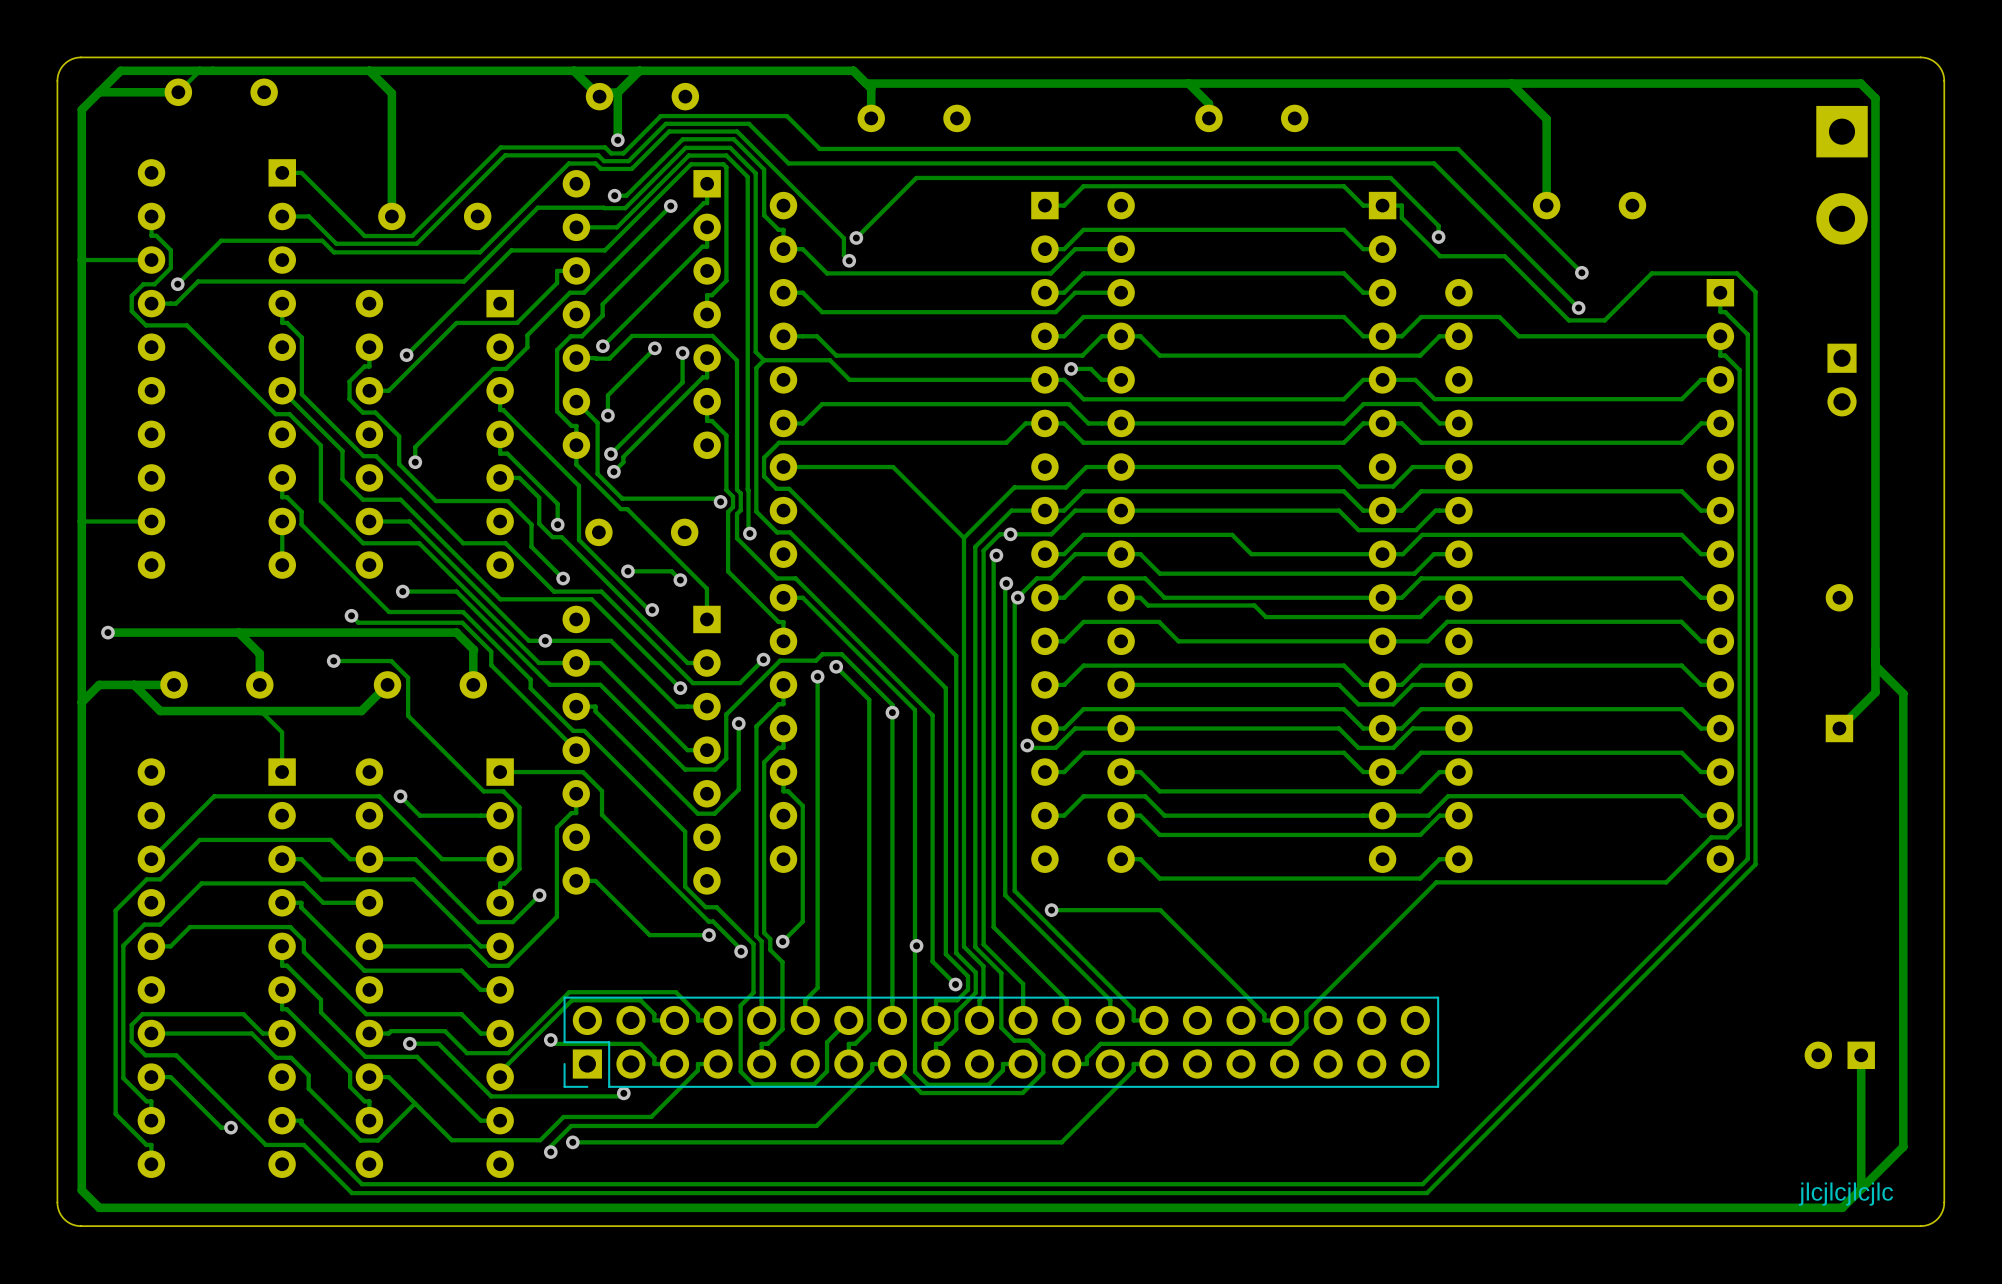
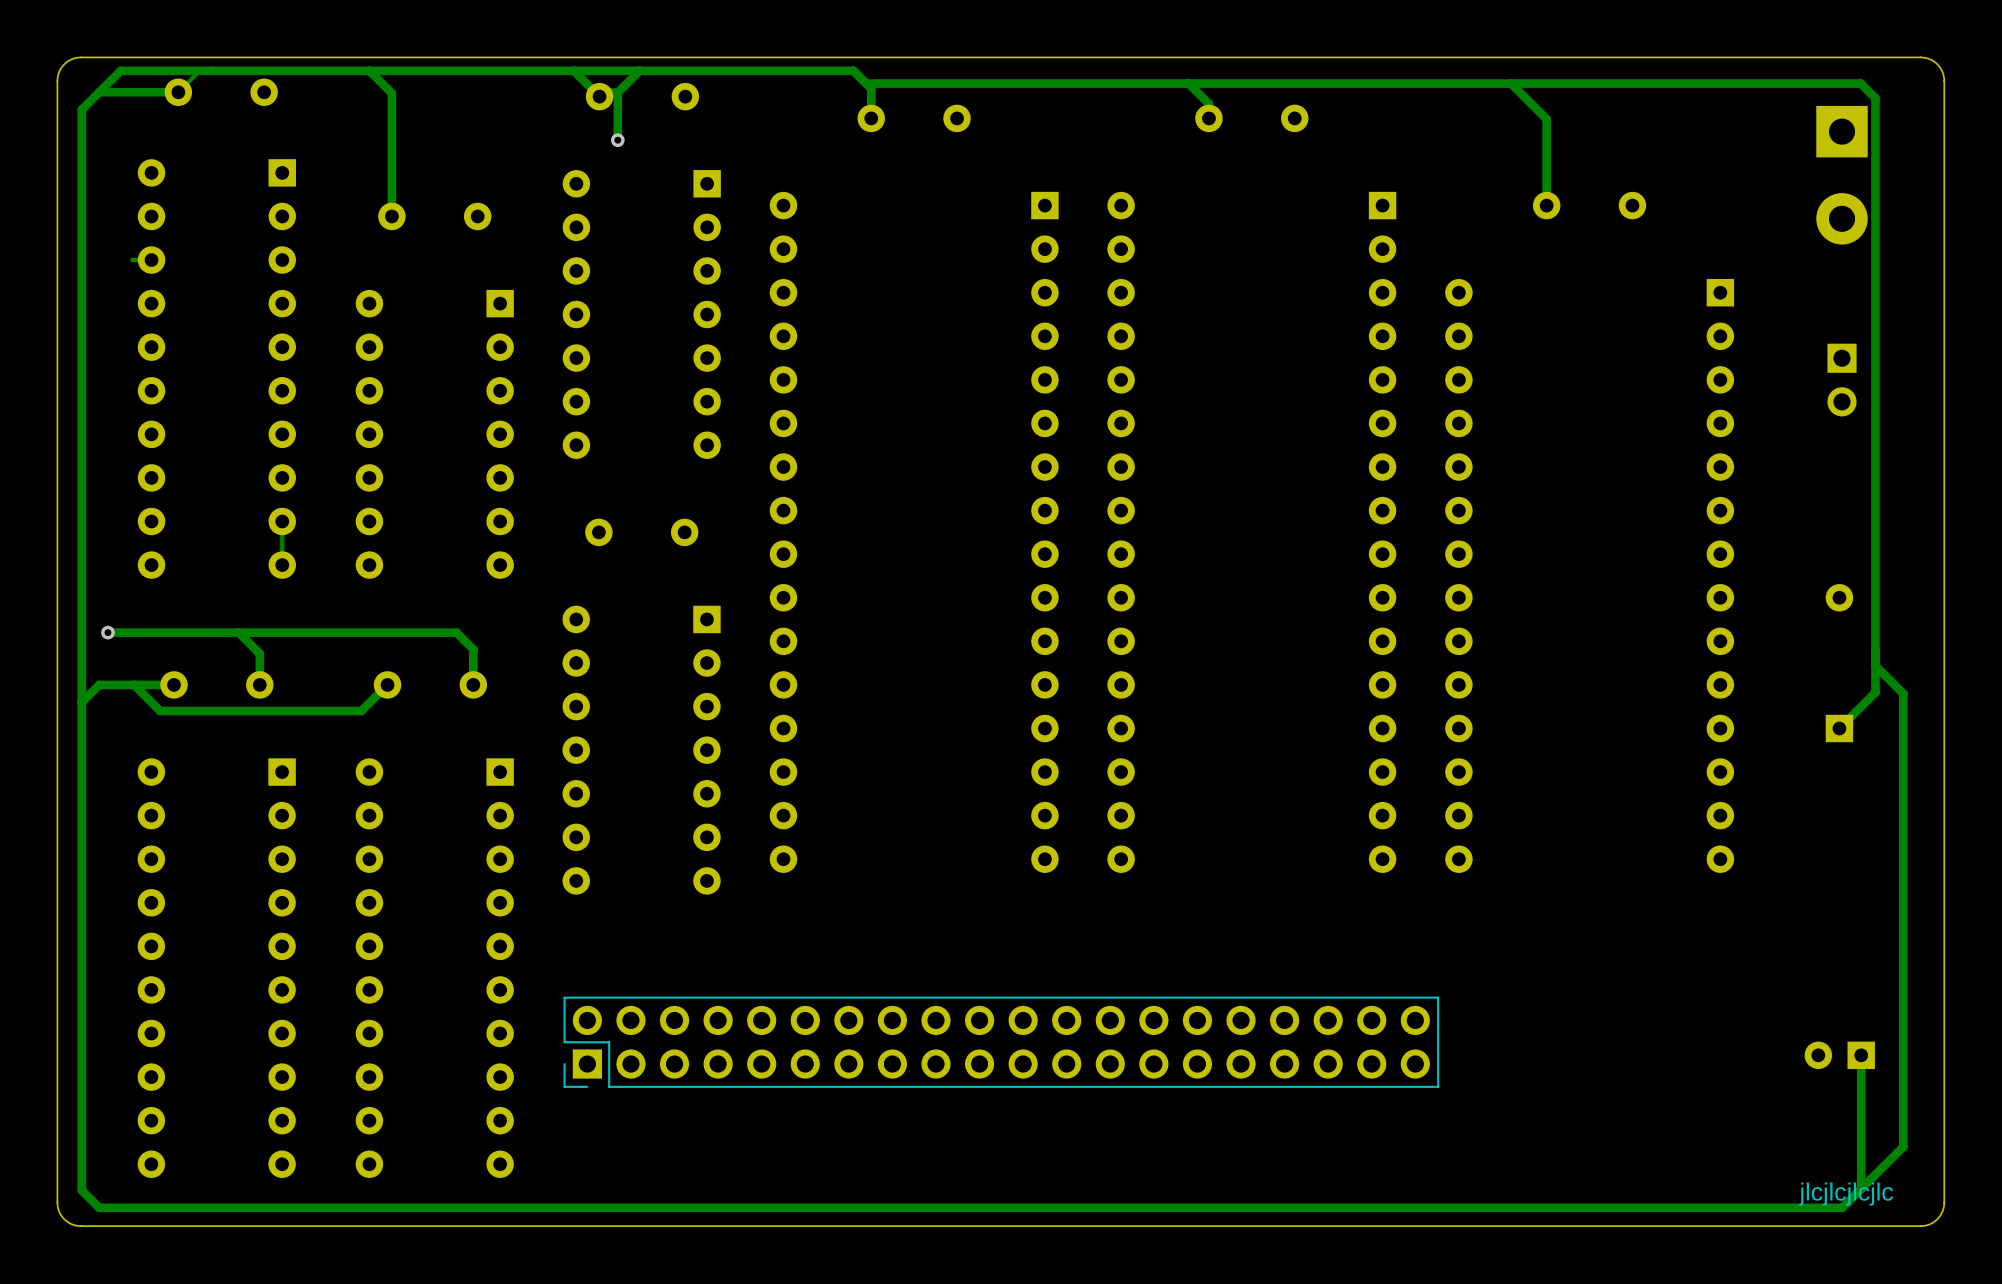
track: (282, 172) (301, 172) (364, 236) (412, 236) (500, 147) (605, 147) (611, 153) (623, 153) (660, 116) (786, 116) (819, 148) (1458, 148) (1581, 272) -> none
track: (707, 183) (707, 203) (703, 203) (602, 304) (602, 315) (581, 336) (570, 336) (557, 349) (557, 411) (571, 425) (576, 425) (576, 464) (620, 509) (627, 509) (706, 588) (706, 619) -> none
track: (614, 195) (626, 195) (682, 139) (733, 139) (764, 169) (764, 215) (778, 229) (783, 229) (783, 249) (802, 249) (827, 273) (1050, 273) (1075, 249) (1121, 249) -> none
via: (614, 195) -> none
track: (1044, 205) (1064, 205) (1083, 186) (1343, 186) (1363, 205) (1401, 205) (1401, 217) (1440, 256) (1504, 256) (1568, 320) (1604, 320) (1651, 273) (1736, 273) (1755, 291) (1755, 864) (1426, 1193) (352, 1193) (303, 1144) (265, 1144) (176, 1055) (145, 1055) (131, 1041) (131, 1024) (142, 1014) (243, 1014) (262, 1033) (282, 1033) -> none
track: (670, 206) (584, 292) (570, 292) (527, 335) (527, 347) (505, 368) (493, 368) (415, 447) (415, 462) -> none
via: (670, 206) -> none
track: (151, 216) (151, 235) (156, 235) (170, 250) (170, 268) (154, 284) (143, 284) (131, 295) (131, 311) (146, 325) (186, 325) (275, 414) (289, 414) (320, 445) (320, 500) (363, 543) (419, 543) (539, 663) (600, 663) (687, 750) (706, 750) -> none
track: (282, 216) (309, 216) (336, 243) (416, 243) (505, 155) (598, 155) (604, 161) (628, 161) (665, 123) (748, 123) (788, 163) (1434, 163) (1578, 307) -> none
track: (576, 227) (617, 227) (688, 155) (726, 155) (747, 176) (747, 489) (749, 533) -> none
track: (707, 227) (707, 246) (702, 246) (602, 346) -> none
via: (856, 237) -> none
track: (1438, 237) (1438, 225) (1390, 177) (916, 177) (856, 237) -> none
via: (1438, 237) -> none
track: (1382, 249) (1363, 249) (1343, 229) (1083, 229) (1064, 249) (1044, 249) -> none
track: (132, 260) (81, 260) -> none
track: (849, 260) (843, 255) (843, 238) (737, 131) (669, 131) (631, 168) (600, 168) (595, 163) (568, 163) (480, 252) (333, 252) (322, 240) (221, 240) (177, 284) -> none
via: (849, 260) -> none
track: (576, 270) (557, 270) (557, 283) (517, 322) (456, 322) (388, 390) (369, 390) -> none
via: (1581, 272) -> none
via: (177, 284) -> none
track: (1121, 292) (1075, 292) (1055, 312) (822, 312) (802, 292) (783, 292) -> none
track: (1382, 292) (1363, 292) (1343, 273) (1083, 273) (1064, 292) (1044, 292) -> none
track: (1720, 292) (1720, 312) (1725, 312) (1747, 334) (1747, 859) (1422, 1184) (362, 1184) (301, 1123) (301, 1120) (282, 1120) -> none
track: (151, 303) (175, 303) (198, 281) (464, 281) (537, 207) (625, 208) (685, 147) (730, 147) (755, 173) (755, 351) (764, 360) -> none
track: (282, 303) (282, 322) (287, 322) (301, 337) (301, 394) (363, 456) (376, 456) (463, 543) (505, 543) (553, 591) (601, 591) (693, 683) (739, 683) (763, 659) -> none
via: (1578, 307) -> none
track: (707, 314) (707, 295) (711, 295) (726, 280) (726, 167) (723, 164) (691, 164) (604, 250) (511, 250) (406, 355) -> none
track: (1044, 336) (1064, 336) (1083, 316) (1343, 316) (1363, 336) (1401, 336) (1421, 316) (1499, 316) (1518, 336) (1720, 336) (1720, 355) (1725, 355) (1739, 370) (1739, 825) (1727, 837) (1711, 837) (1666, 882) (1436, 882) (1306, 1012) (1306, 1027) (1290, 1043) (1100, 1043) (1086, 1057) (1086, 1064) (1066, 1064) -> none
track: (1458, 336) (1439, 336) (1420, 355) (1159, 355) (1140, 336) (1101, 336) (1082, 355) (836, 355) (817, 336) (783, 336) -> none
via: (602, 346) -> none
track: (369, 347) (369, 366) (364, 366) (349, 381) (349, 399) (362, 412) (375, 412) (399, 436) (399, 464) (436, 501) (508, 501) (531, 524) (531, 546) (563, 578) -> none
track: (654, 348) (607, 395) (607, 415) -> none
via: (654, 348) -> none
track: (682, 353) (682, 382) (610, 454) -> none
via: (682, 353) -> none
via: (406, 355) -> none
track: (576, 358) (609, 358) (632, 335) (712, 335) (737, 360) (737, 489) (740, 493) (740, 510) (737, 513) (737, 538) (777, 578) (795, 578) (932, 715) (932, 961) (955, 984) -> none
track: (707, 358) (707, 377) (702, 377) (623, 456) (623, 462) (613, 471) -> none
track: (764, 360) (830, 360) (849, 379) (1064, 379) (1083, 399) (1343, 399) (1363, 379) (1415, 379) (1434, 399) (1681, 399) (1701, 379) (1720, 379) -> none
track: (764, 360) (756, 367) (756, 511) (777, 532) (790, 532) (945, 688) (945, 954) (968, 976) (968, 989) (957, 1000) (936, 1000) (936, 1020) -> none
track: (1071, 368) (1090, 368) (1101, 379) (1121, 379) -> none
via: (1071, 368) -> none
track: (282, 390) (342, 450) (342, 479) (362, 499) (400, 499) (500, 599) (591, 599) (680, 688) -> none
track: (500, 390) (500, 410) (503, 410) (579, 485) (579, 540) (648, 609) (652, 609) -> none
track: (576, 401) (597, 422) (597, 473) (622, 498) (717, 498) (720, 501) -> none
track: (707, 401) (707, 420) (711, 420) (726, 435) (726, 490) (733, 496) (733, 507) (728, 511) (728, 571) (778, 622) (783, 622) (783, 641) -> none
via: (607, 415) -> none
track: (1458, 423) (1439, 423) (1420, 404) (1363, 404) (1344, 423) (1088, 423) (1069, 404) (822, 404) (802, 423) (783, 423) -> none
track: (1720, 423) (1701, 423) (1681, 442) (1421, 442) (1401, 423) (1363, 423) (1343, 442) (1083, 442) (1064, 423) (1025, 423) (1006, 442) (779, 442) (764, 457) (764, 476) (776, 488) (789, 488) (956, 655) (956, 953) (975, 972) (975, 992) (956, 1012) (956, 1029) (941, 1043) (936, 1043) (936, 1064) -> none
track: (500, 434) (500, 453) (507, 453) (557, 503) (557, 524) -> none
via: (610, 454) -> none
via: (415, 462) -> none
track: (783, 467) (893, 467) (963, 537) -> none
track: (1458, 467) (1412, 467) (1393, 486) (1358, 486) (1339, 467) (1086, 467) (1065, 487) (1014, 487) (963, 537) -> none
via: (613, 471) -> none
track: (282, 477) (282, 497) (287, 497) (301, 511) (301, 524) (389, 612) (463, 612) (530, 679) (530, 688) (573, 730) (584, 730) (685, 831) (685, 886) (705, 907) (716, 907) (753, 944) (753, 992) (740, 1005) (740, 1071) (753, 1084) (814, 1084) (827, 1071) (827, 1042) (848, 1020) -> none
track: (500, 477) (519, 477) (539, 497) (539, 523) (552, 537) (561, 537) (687, 663) (706, 663) -> none
via: (720, 501) -> none
track: (1458, 510) (1435, 510) (1416, 530) (1358, 530) (1339, 510) (1075, 510) (1051, 534) (999, 534) (983, 550) (983, 944) (1023, 984) (1023, 1020) -> none
track: (1720, 510) (1701, 510) (1681, 491) (1421, 491) (1401, 510) (1363, 510) (1343, 491) (1083, 491) (1064, 510) (1011, 510) (975, 546) (975, 947) (1001, 973) (1001, 1027) (1014, 1040) (1028, 1040) (1043, 1055) (1043, 1072) (1022, 1093) (921, 1093) (892, 1064) (872, 1064) (872, 1070) (816, 1125) (571, 1125) (550, 1146) (550, 1152) -> none
track: (151, 521) (81, 521) -> none
track: (369, 521) (409, 521) (528, 640) (610, 640) (676, 706) (706, 706) -> none
via: (557, 524) -> none
via: (749, 533) -> none
via: (1010, 534) -> none
track: (963, 537) (963, 946) (983, 966) (983, 996) (979, 1000) (979, 1020) -> none
track: (1458, 554) (1433, 554) (1414, 573) (1159, 573) (1140, 554) (1075, 554) (1050, 578) (1036, 578) (1014, 600) (1014, 890) (1133, 1009) (1133, 1020) (1153, 1020) -> none
track: (1720, 554) (1701, 554) (1681, 534) (1422, 534) (1402, 554) (1251, 554) (1232, 534) (1083, 534) (1064, 554) (1044, 554) -> none
track: (996, 555) (993, 558) (993, 927) (1066, 1000) (1066, 1020) -> none
via: (996, 555) -> none
track: (627, 571) (671, 571) (680, 580) -> none
via: (627, 571) -> none
via: (563, 578) -> none
via: (680, 580) -> none
track: (1006, 583) (1005, 895) (1110, 1000) (1110, 1020) -> none
via: (1006, 583) -> none
track: (402, 591) (456, 591) (549, 684) (600, 684) (685, 769) (715, 769) (726, 758) (726, 714) (780, 660) (816, 660) (822, 654) (841, 654) (892, 704) (892, 1020) -> none
via: (402, 591) -> none
track: (783, 597) (802, 597) (915, 709) (915, 1071) (927, 1084) (988, 1084) (1002, 1070) (1002, 1064) (1023, 1064) -> none
via: (1017, 597) -> none
track: (1458, 597) (1439, 597) (1420, 617) (1266, 617) (1254, 605) (1148, 605) (1140, 597) (1121, 597) -> none
track: (1720, 597) (1701, 597) (1681, 578) (1421, 578) (1401, 597) (1164, 597) (1145, 578) (1083, 578) (1064, 597) (1044, 597) -> none
via: (652, 609) -> none
track: (351, 615) (358, 622) (462, 622) (491, 651) (491, 665) (576, 750) -> none
via: (351, 615) -> none
via: (545, 640) -> none
track: (1720, 641) (1701, 641) (1681, 621) (1447, 621) (1427, 641) (1178, 641) (1159, 621) (1083, 621) (1064, 641) (1044, 641) -> none
via: (763, 659) -> none
track: (333, 661) (391, 661) (408, 677) (408, 715) (483, 791) (503, 791) (519, 807) (519, 869) (504, 883) (500, 883) (500, 902) -> none
via: (333, 661) -> none
track: (836, 666) (869, 699) (869, 1029) (855, 1043) (848, 1043) (848, 1064) -> none
via: (836, 666) -> none
track: (817, 676) (817, 987) (805, 1000) (805, 1020) -> none
via: (817, 676) -> none
track: (783, 684) (783, 704) (778, 704) (756, 726) (756, 936) (761, 941) (761, 1020) -> none
track: (1458, 684) (1412, 684) (1393, 704) (1358, 704) (1339, 684) (1121, 684) -> none
track: (1720, 684) (1701, 684) (1681, 665) (1421, 665) (1401, 684) (1363, 684) (1343, 665) (1083, 665) (1064, 684) (1044, 684) -> none
via: (680, 688) -> none
track: (576, 706) (595, 706) (595, 711) (697, 813) (714, 813) (738, 789) (738, 723) -> none
track: (260, 711) (282, 732) (282, 772) -> none
via: (892, 712) -> none
via: (738, 723) -> none
track: (783, 728) (783, 747) (778, 747) (764, 762) (764, 932) (770, 939) (770, 949) (782, 962) (782, 1029) (767, 1043) (761, 1043) (761, 1064) -> none
track: (1458, 728) (1412, 728) (1393, 747) (1358, 747) (1339, 728) (1075, 728) (1055, 747) (1029, 747) (1027, 745) -> none
track: (1720, 728) (1701, 728) (1681, 709) (1421, 709) (1401, 728) (1363, 728) (1343, 709) (1083, 709) (1064, 728) (1044, 728) -> none
via: (1027, 745) -> none
track: (500, 772) (582, 772) (602, 791) (602, 814) (708, 921) (713, 921) (741, 951) -> none
track: (783, 772) (783, 791) (788, 791) (802, 805) (802, 921) (782, 941) -> none
track: (1458, 772) (1439, 772) (1420, 791) (1159, 791) (1140, 772) (1121, 772) -> none
track: (1720, 772) (1701, 772) (1681, 752) (1421, 752) (1401, 772) (1363, 772) (1343, 752) (1083, 752) (1064, 772) (1044, 772) -> none
track: (576, 793) (576, 813) (571, 813) (556, 827) (556, 916) (508, 965) (489, 965) (469, 946) (369, 946) -> none
track: (400, 796) (419, 815) (500, 815) -> none
via: (400, 796) -> none
track: (1458, 815) (1439, 815) (1420, 834) (1159, 834) (1140, 815) (1121, 815) -> none
track: (1720, 815) (1701, 815) (1681, 796) (1448, 796) (1428, 815) (1164, 815) (1145, 796) (1083, 796) (1064, 815) (1044, 815) -> none
track: (282, 859) (301, 859) (321, 879) (413, 879) (480, 946) (500, 946) -> none
track: (500, 859) (442, 859) (379, 796) (214, 796) (151, 859) -> none
track: (1458, 859) (1439, 859) (1420, 878) (1159, 878) (1140, 859) (1121, 859) -> none
track: (576, 880) (595, 880) (649, 935) (709, 935) -> none
track: (539, 895) (512, 922) (478, 922) (415, 859) (350, 859) (330, 839) (199, 839) (160, 879) (146, 879) (115, 910) (115, 1114) (146, 1144) (151, 1144) (151, 1164) -> none
via: (539, 895) -> none
track: (282, 902) (301, 902) (301, 907) (364, 970) (461, 970) (480, 989) (500, 989) -> none
track: (369, 902) (323, 902) (303, 883) (201, 883) (160, 924) (144, 924) (123, 945) (123, 1078) (146, 1101) (151, 1101) (151, 1120) -> none
track: (1051, 910) (1160, 910) (1264, 1014) (1264, 1020) (1284, 1020) -> none
via: (1051, 910) -> none
via: (709, 935) -> none
via: (782, 941) -> none
via: (916, 945) -> none
track: (151, 946) (170, 946) (189, 927) (290, 927) (303, 940) (303, 951) (366, 1014) (461, 1014) (480, 1033) (500, 1033) -> none
track: (282, 946) (282, 965) (286, 965) (321, 999) (321, 1012) (365, 1056) (417, 1056) (480, 1120) (500, 1120) -> none
via: (741, 951) -> none
via: (955, 984) -> none
track: (282, 989) (282, 1009) (286, 1009) (350, 1072) (350, 1086) (364, 1101) (369, 1101) (369, 1120) -> none
track: (674, 1020) (654, 1020) (654, 1014) (640, 1000) (572, 1000) (500, 1072) (500, 1077) -> none
track: (718, 1020) (697, 1020) (697, 1014) (676, 992) (569, 992) (508, 1053) (467, 1053) (445, 1031) (391, 1031) (388, 1033) (369, 1033) -> none
track: (151, 1033) (251, 1033) (276, 1057) (291, 1057) (308, 1075) (308, 1088) (360, 1140) (377, 1140) (415, 1103) -> none
track: (550, 1039) (554, 1043) (640, 1043) (654, 1057) (654, 1064) (674, 1064) -> none
via: (550, 1039) -> none
track: (409, 1043) (438, 1043) (491, 1096) (620, 1096) (623, 1093) -> none
via: (409, 1043) -> none
track: (718, 1064) (697, 1064) (697, 1070) (651, 1116) (563, 1116) (540, 1140) (451, 1140) (388, 1077) (369, 1077) -> none
track: (1153, 1064) (1133, 1064) (1133, 1070) (1061, 1142) (572, 1142) -> none
track: (151, 1077) (170, 1077) (221, 1127) (231, 1127) -> none
via: (623, 1093) -> none
via: (231, 1127) -> none
via: (572, 1142) -> none
via: (550, 1152) -> none

